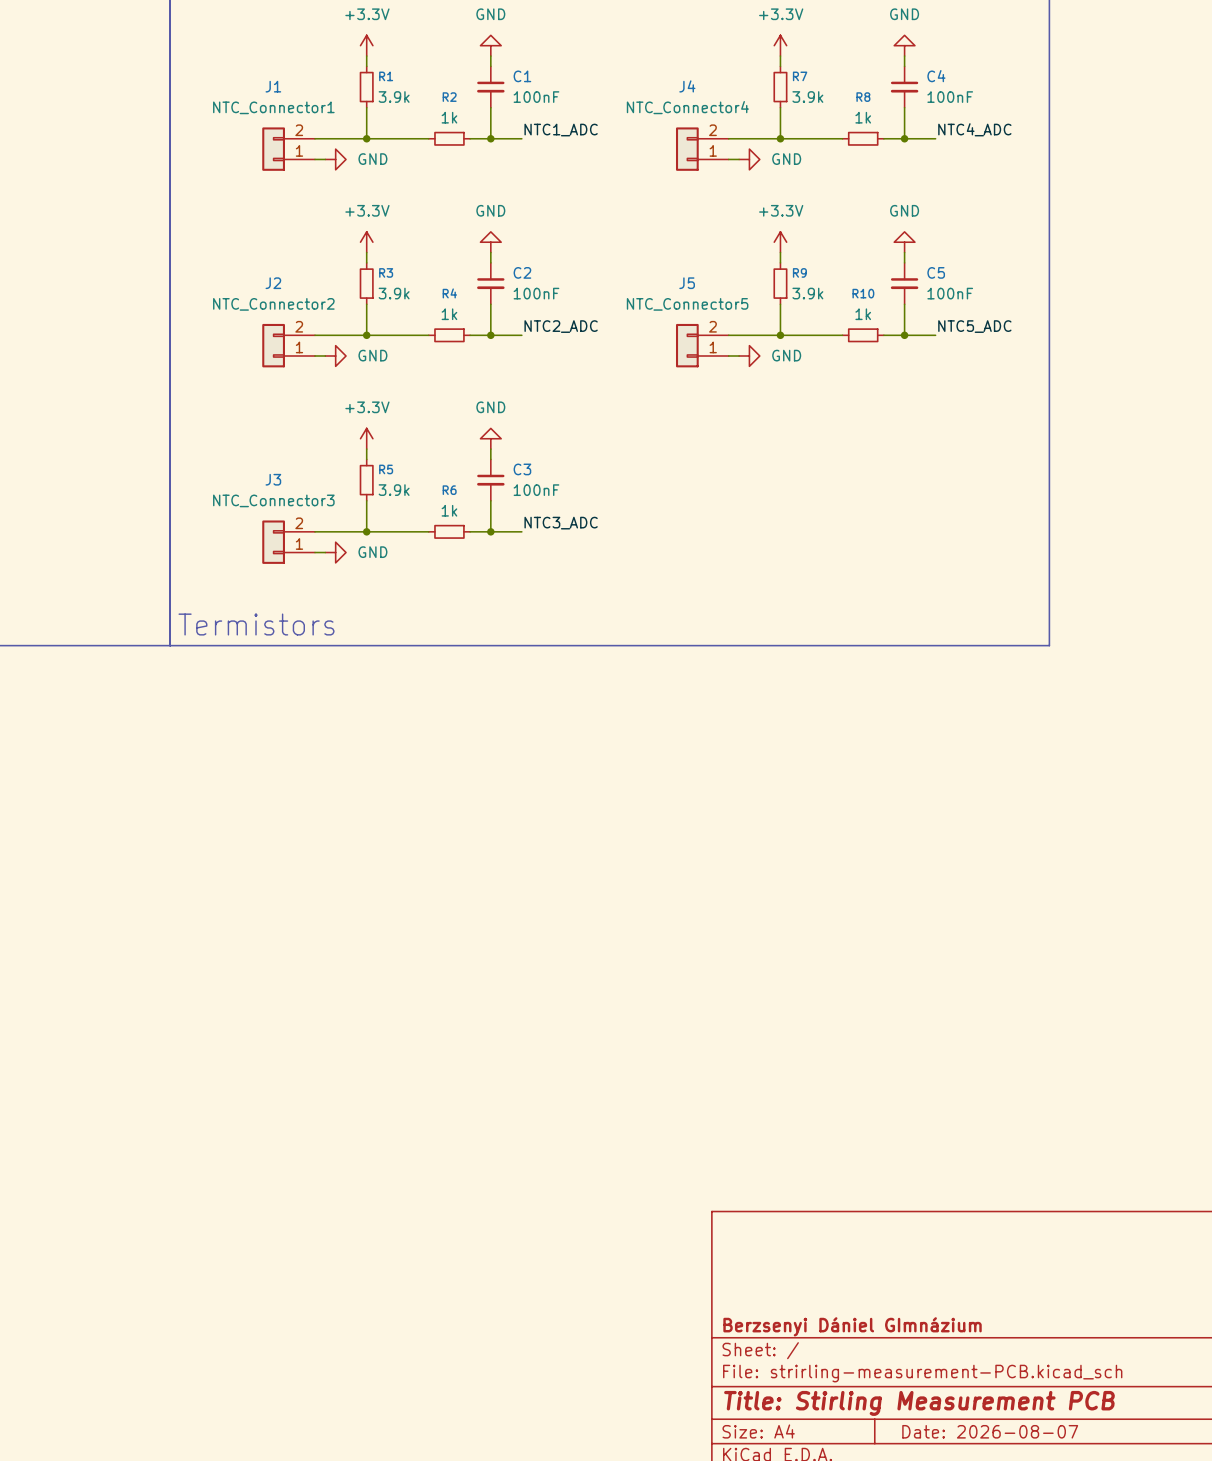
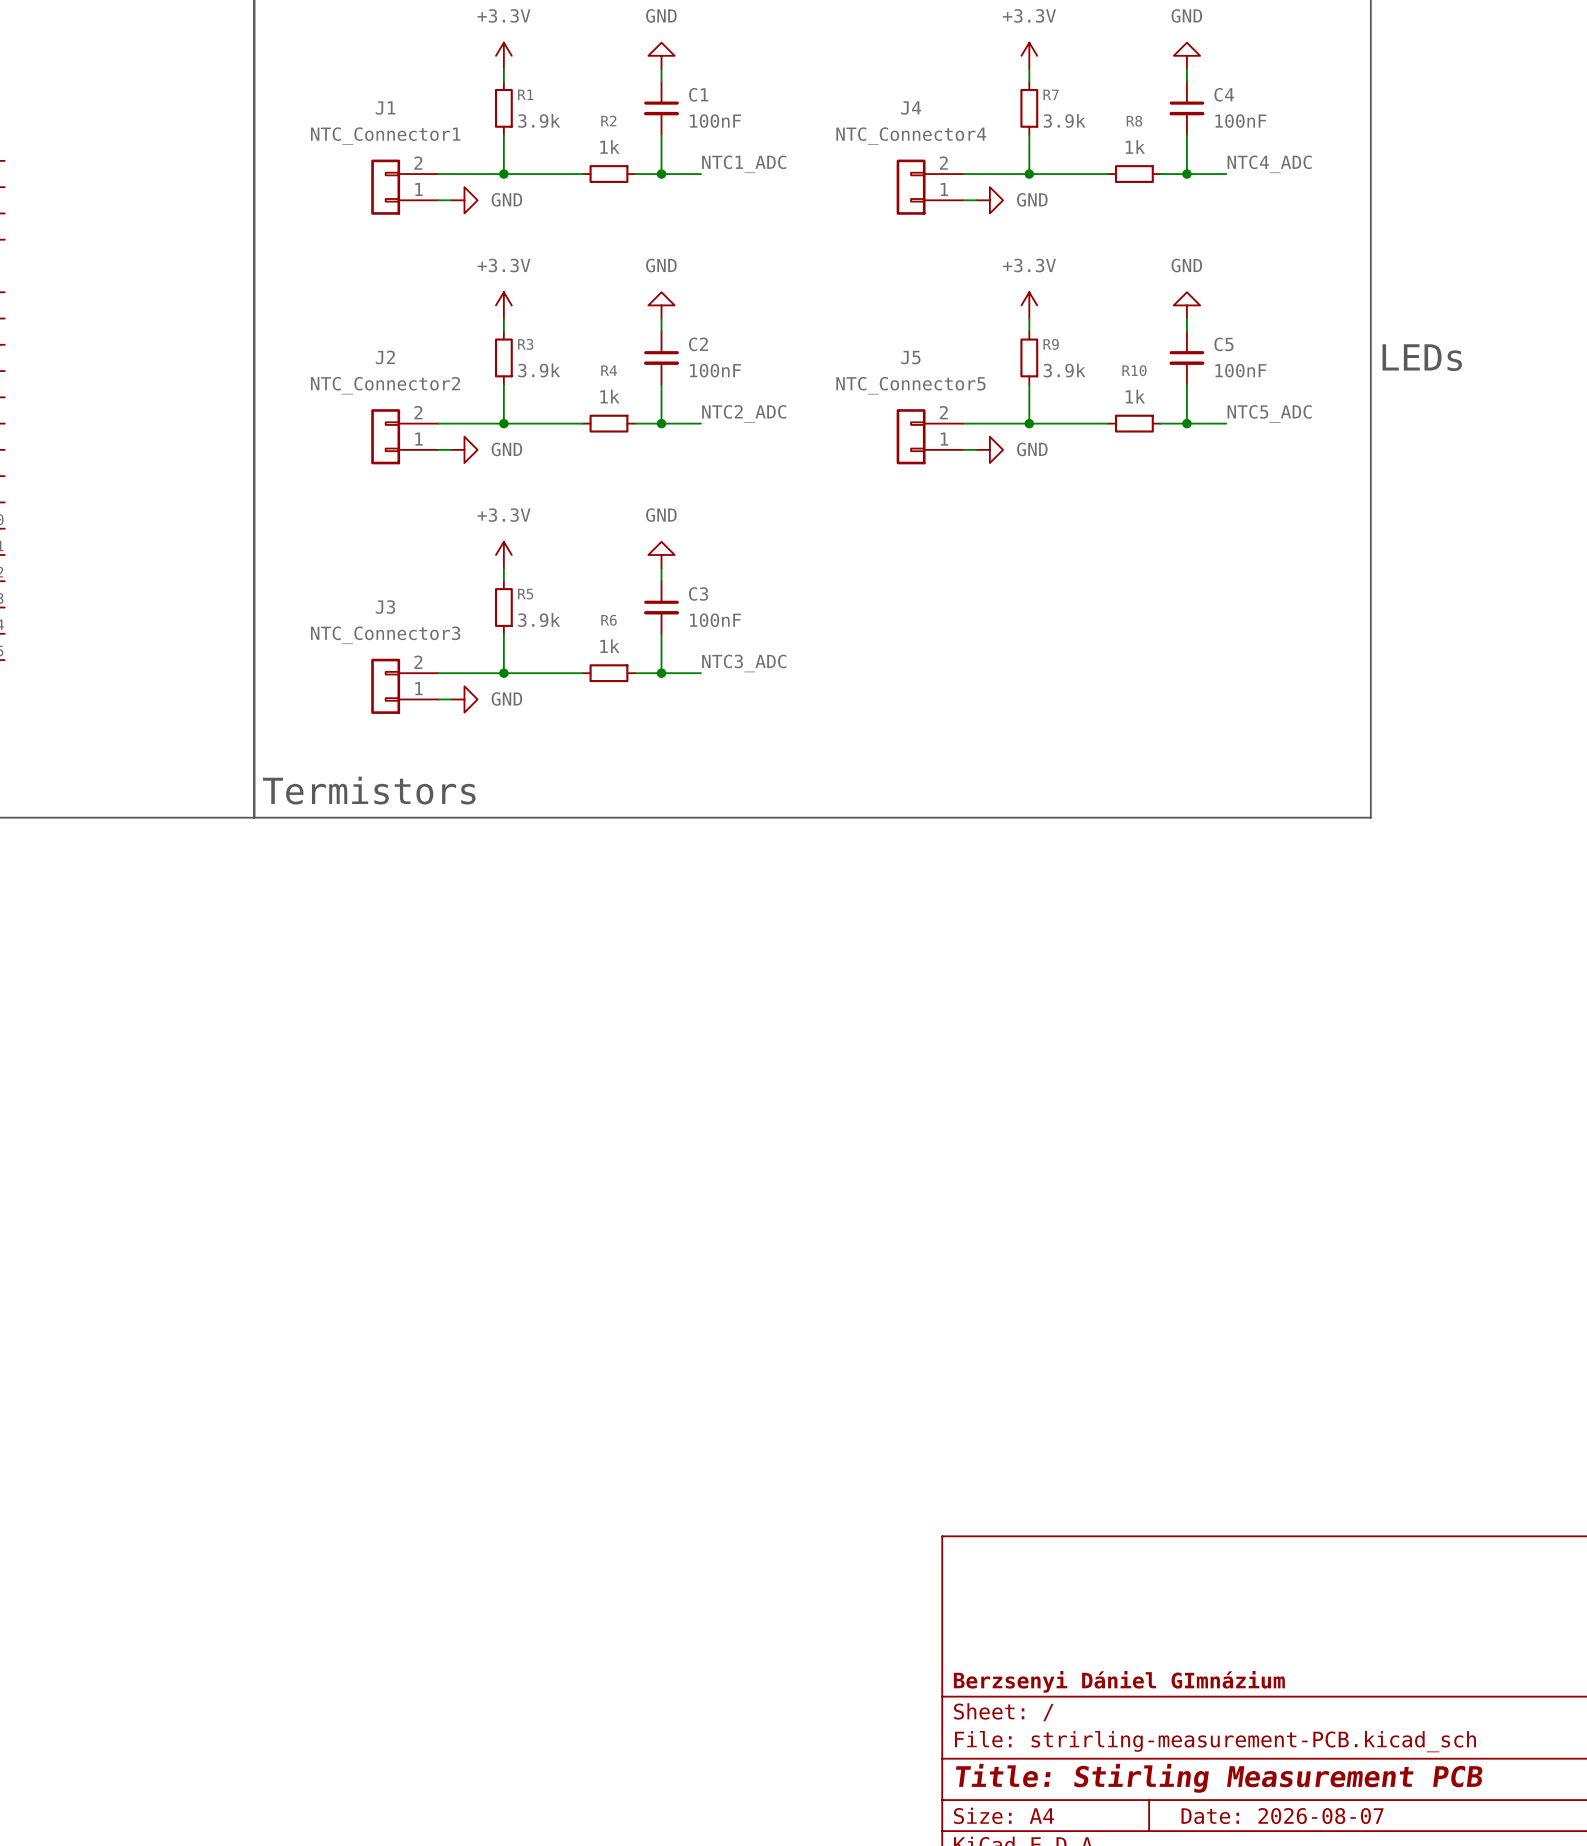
text: none -> LEDs (1422, 357)

